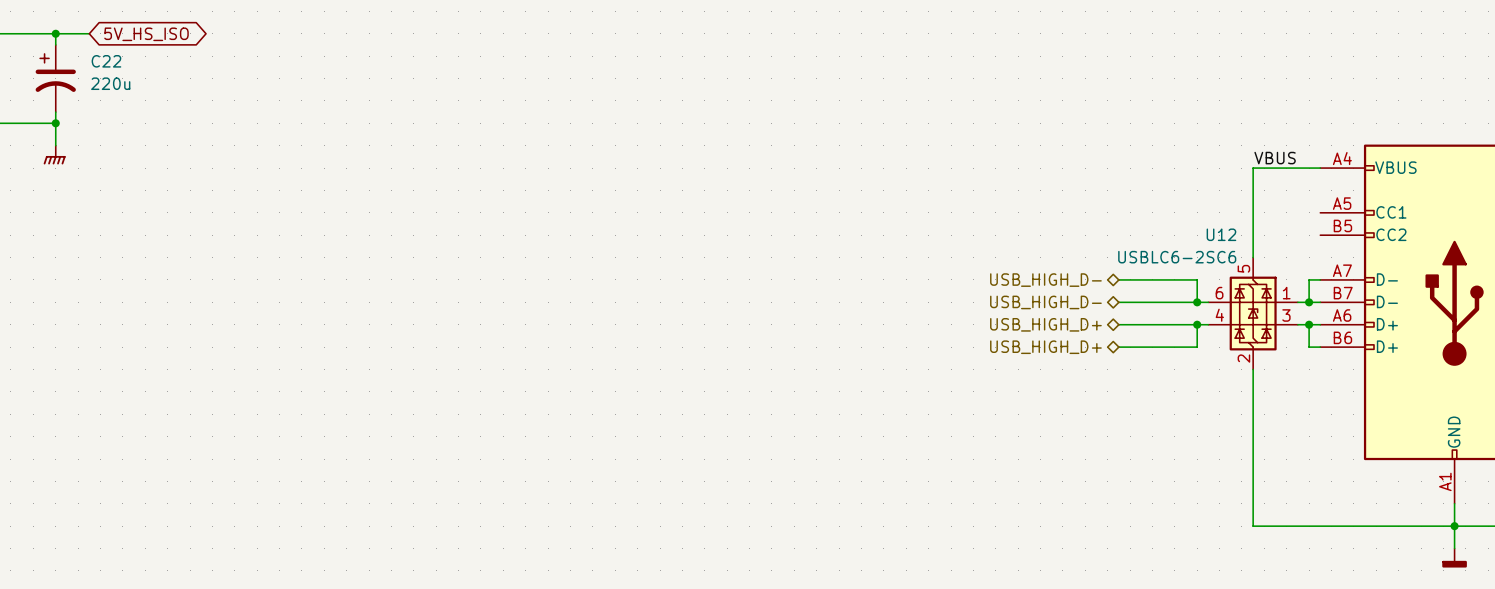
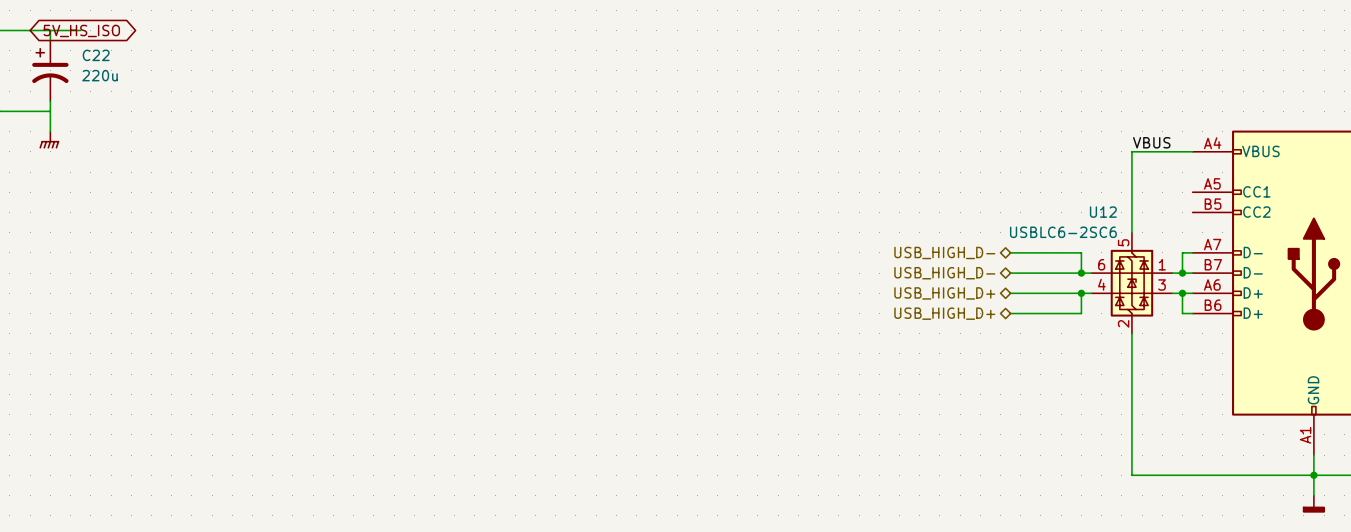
junction: (55, 33) -> none
global label position: 5V_HS_ISO (146, 34) -> 5V_HS_ISO (81, 30)
junction: (55, 123) -> none

